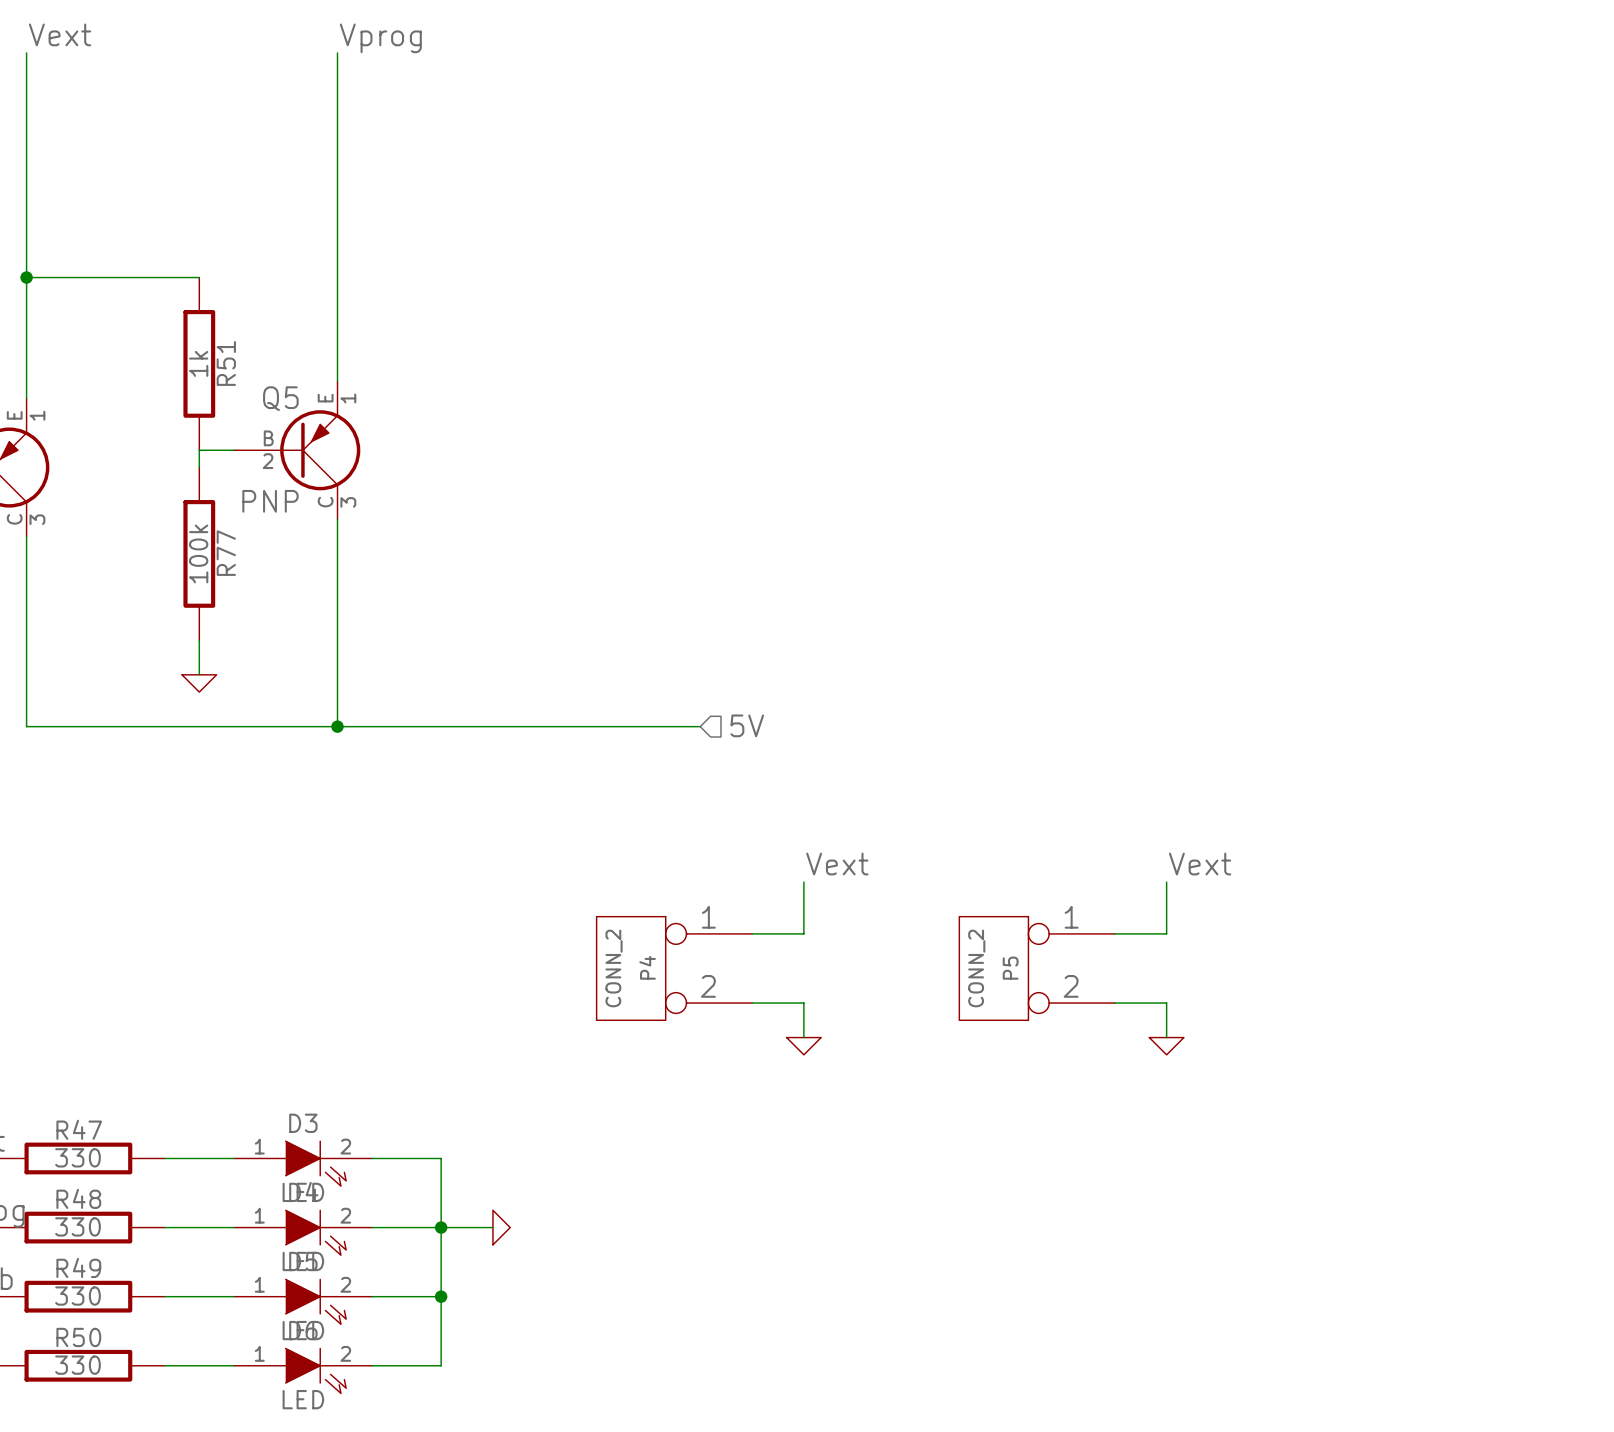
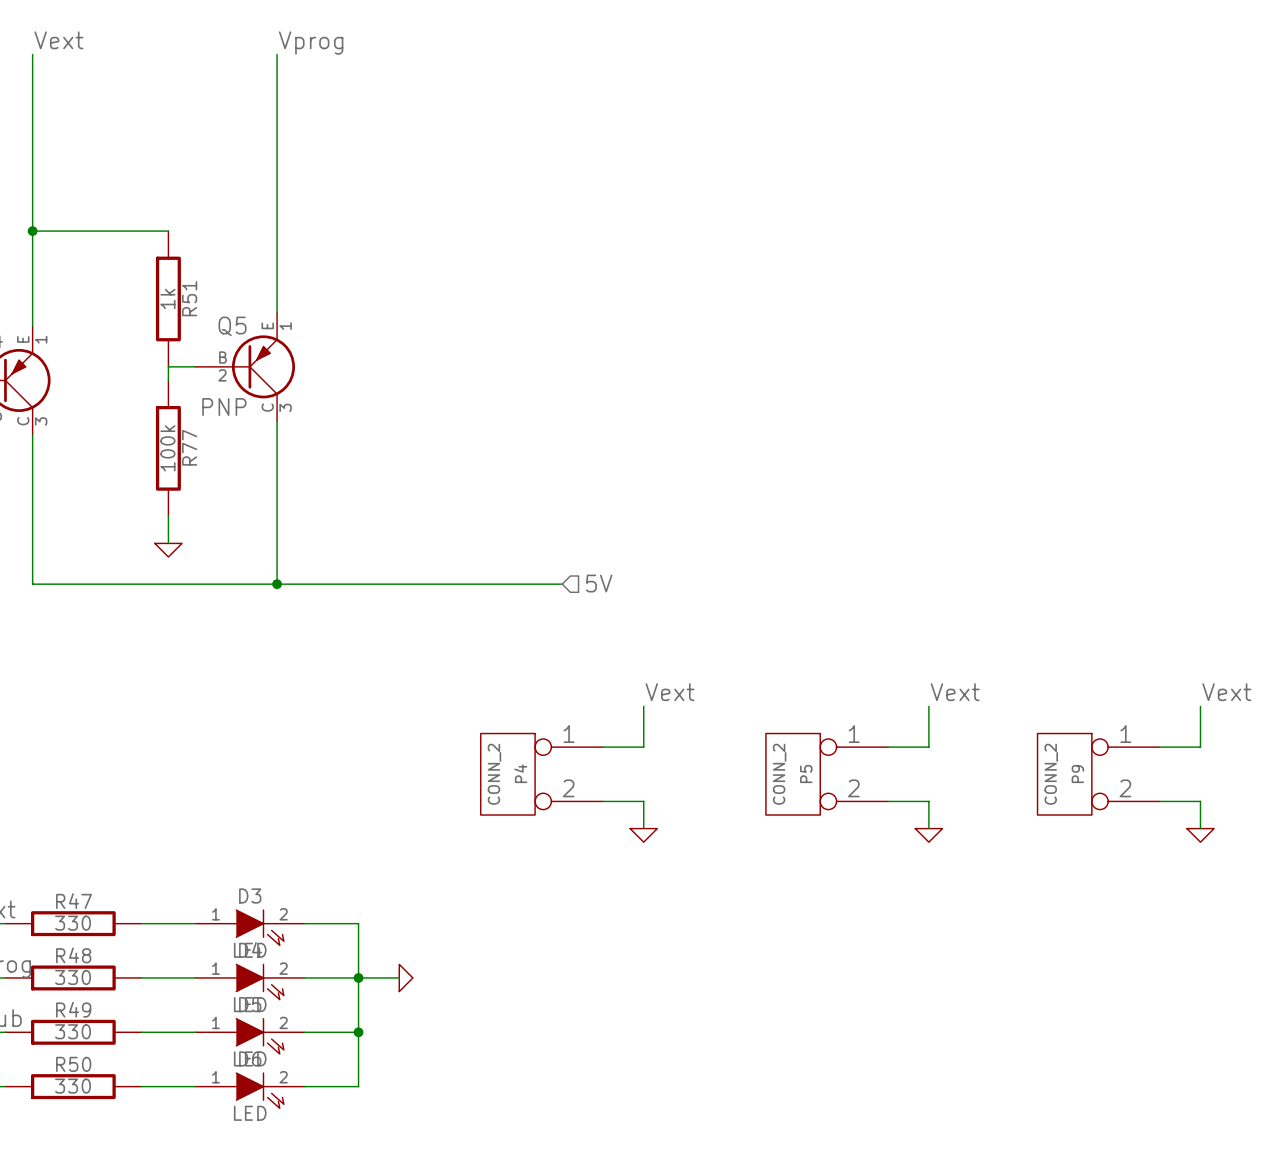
label: none -> Vext (1226, 692)
wire: none -> (1200, 706) (1200, 747) (1159, 747)
P9: none -> CONN_2 (1098, 774)
wire: none -> (1159, 801) (1200, 801) (1200, 828)
power symbol: none -> (1200, 835)

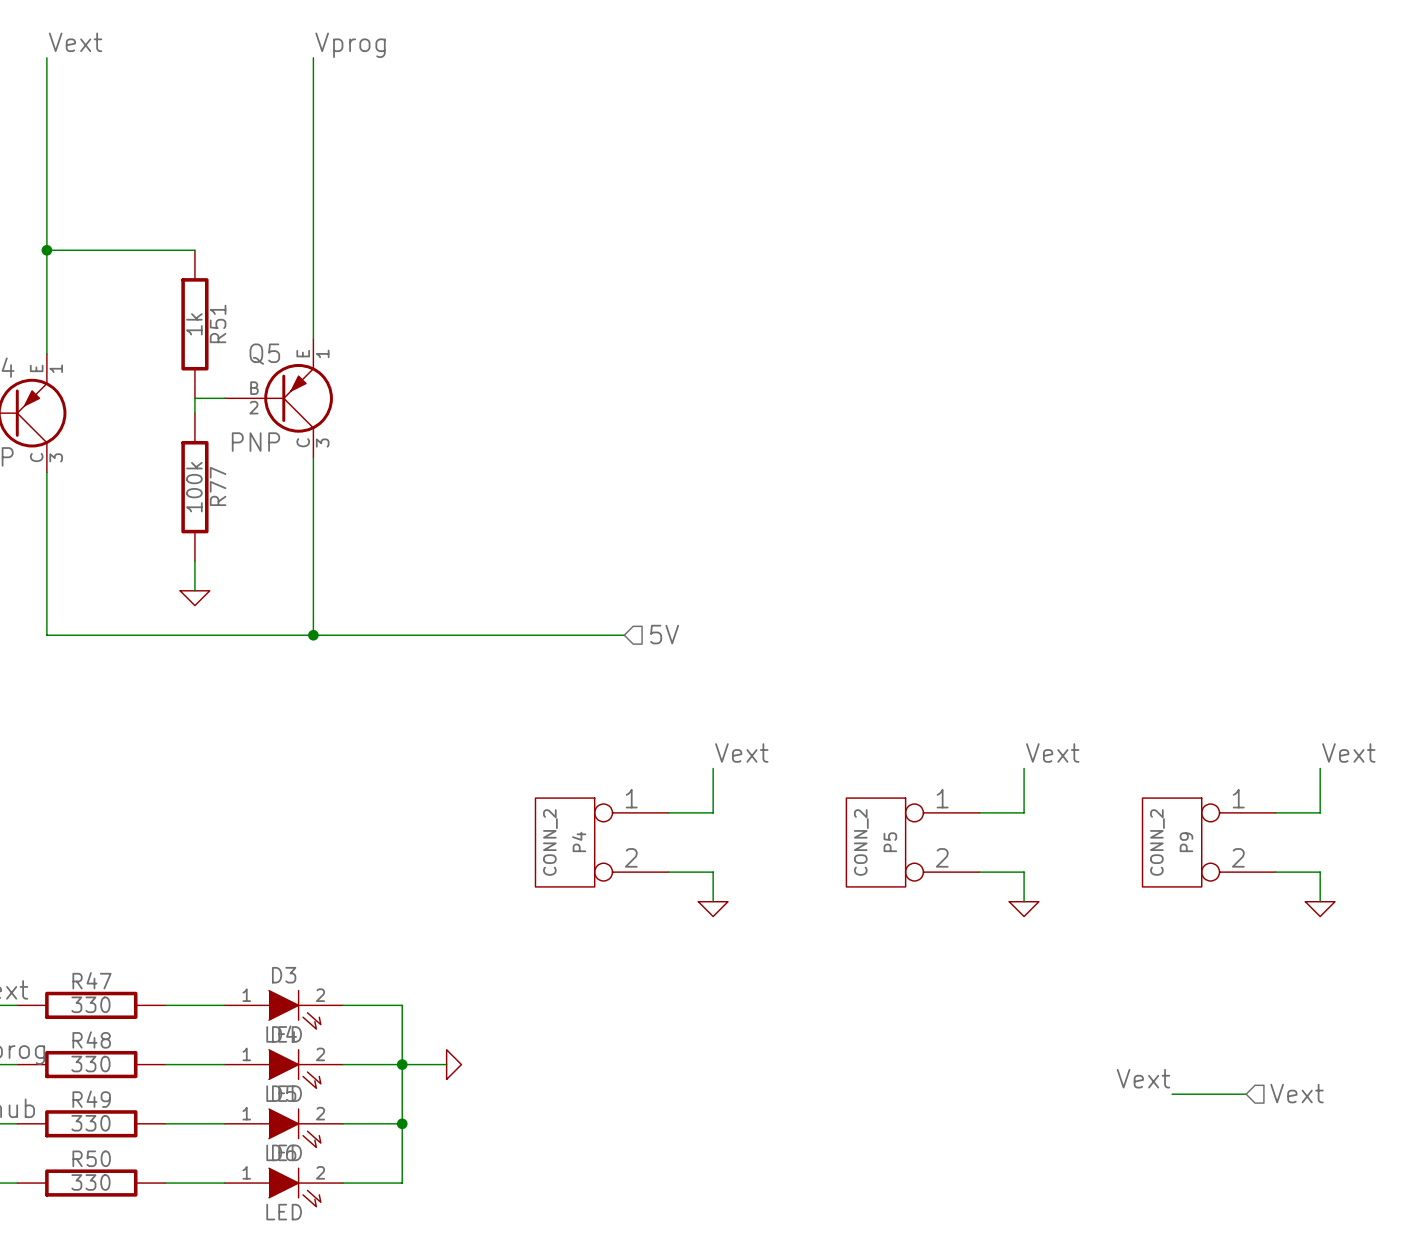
label: none -> Vext (1143, 1078)
hierarchical label: none -> Vext (1297, 1093)
wire: none -> (1172, 1094) (1246, 1094)

